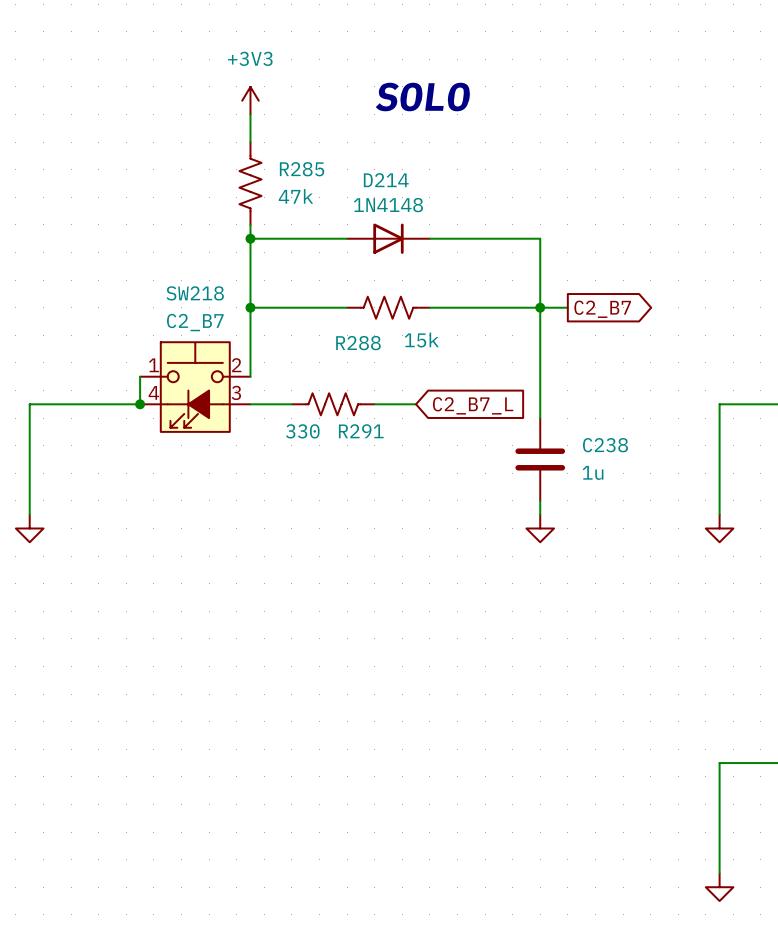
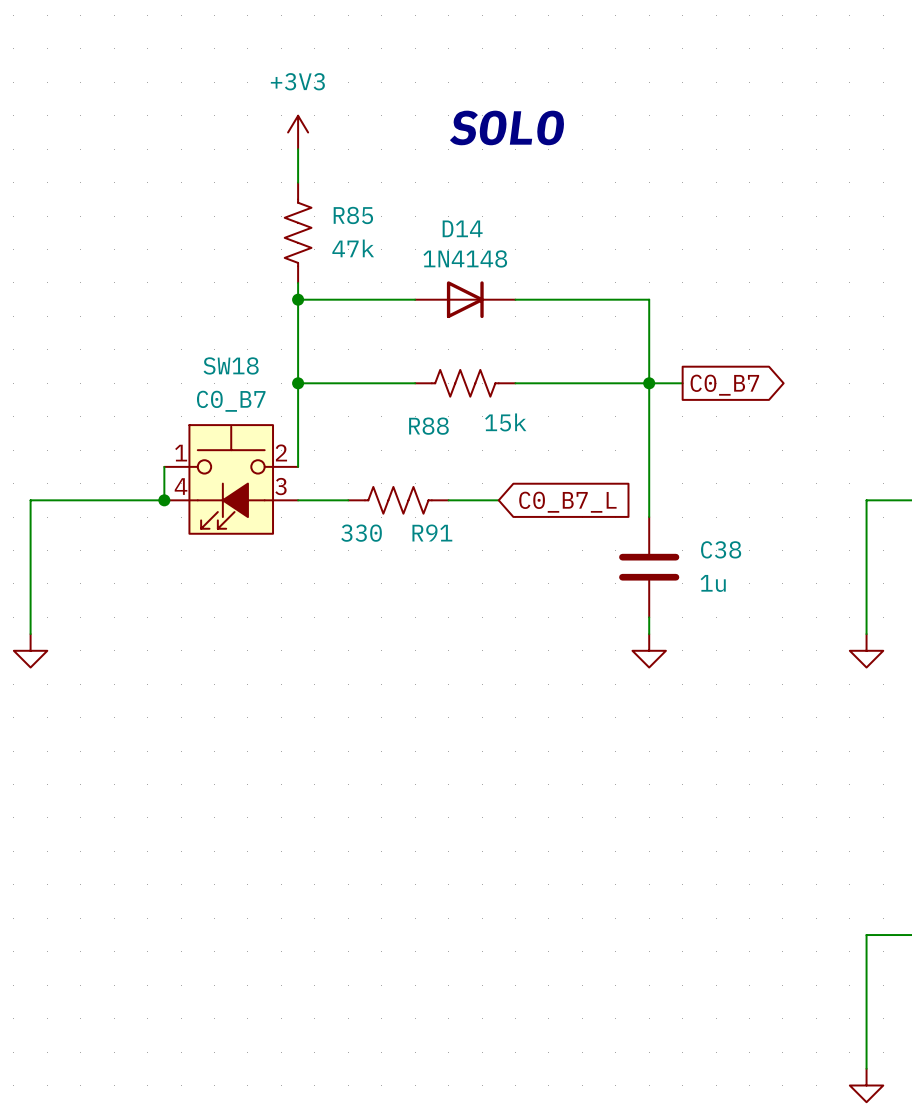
R285 name: R285 (302, 169) -> R85 (353, 215)
D214 name: D214 (386, 180) -> D14 (462, 228)
SW218 name: SW218 (195, 293) -> SW18 (231, 365)
global label: C2_B7 (602, 309) -> C0_B7 (724, 385)
SW218 value: C2_B7 (195, 322) -> C0_B7 (231, 401)
R288 name: R288 (358, 343) -> R88 (428, 426)
global label: C2_B7_L (473, 405) -> C0_B7_L (567, 502)
R291 name: R291 (361, 431) -> R91 (432, 533)
C238 name: C238 (605, 445) -> C38 (721, 549)

